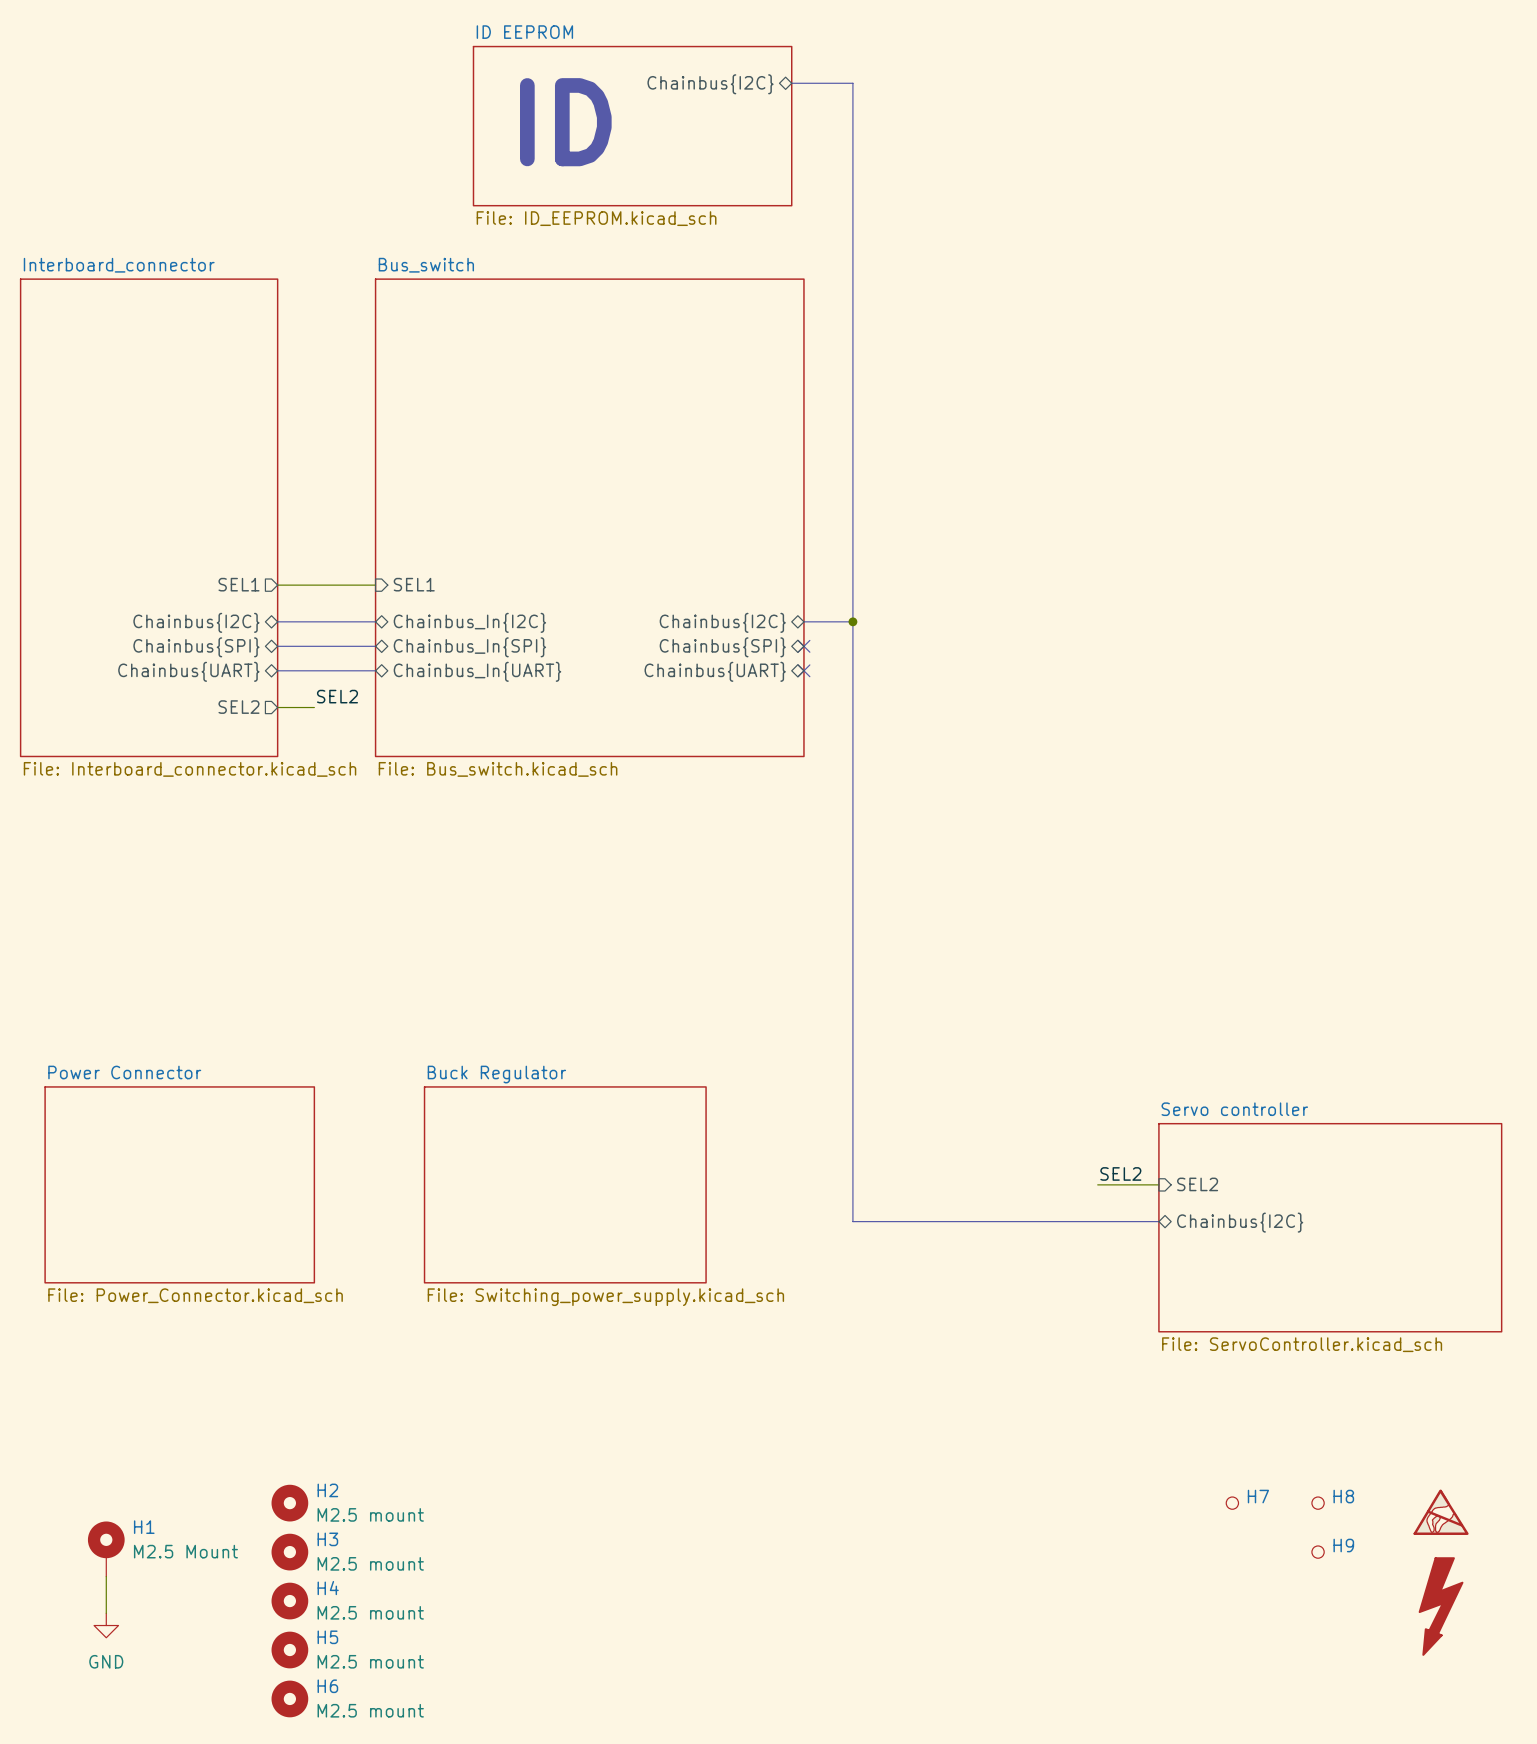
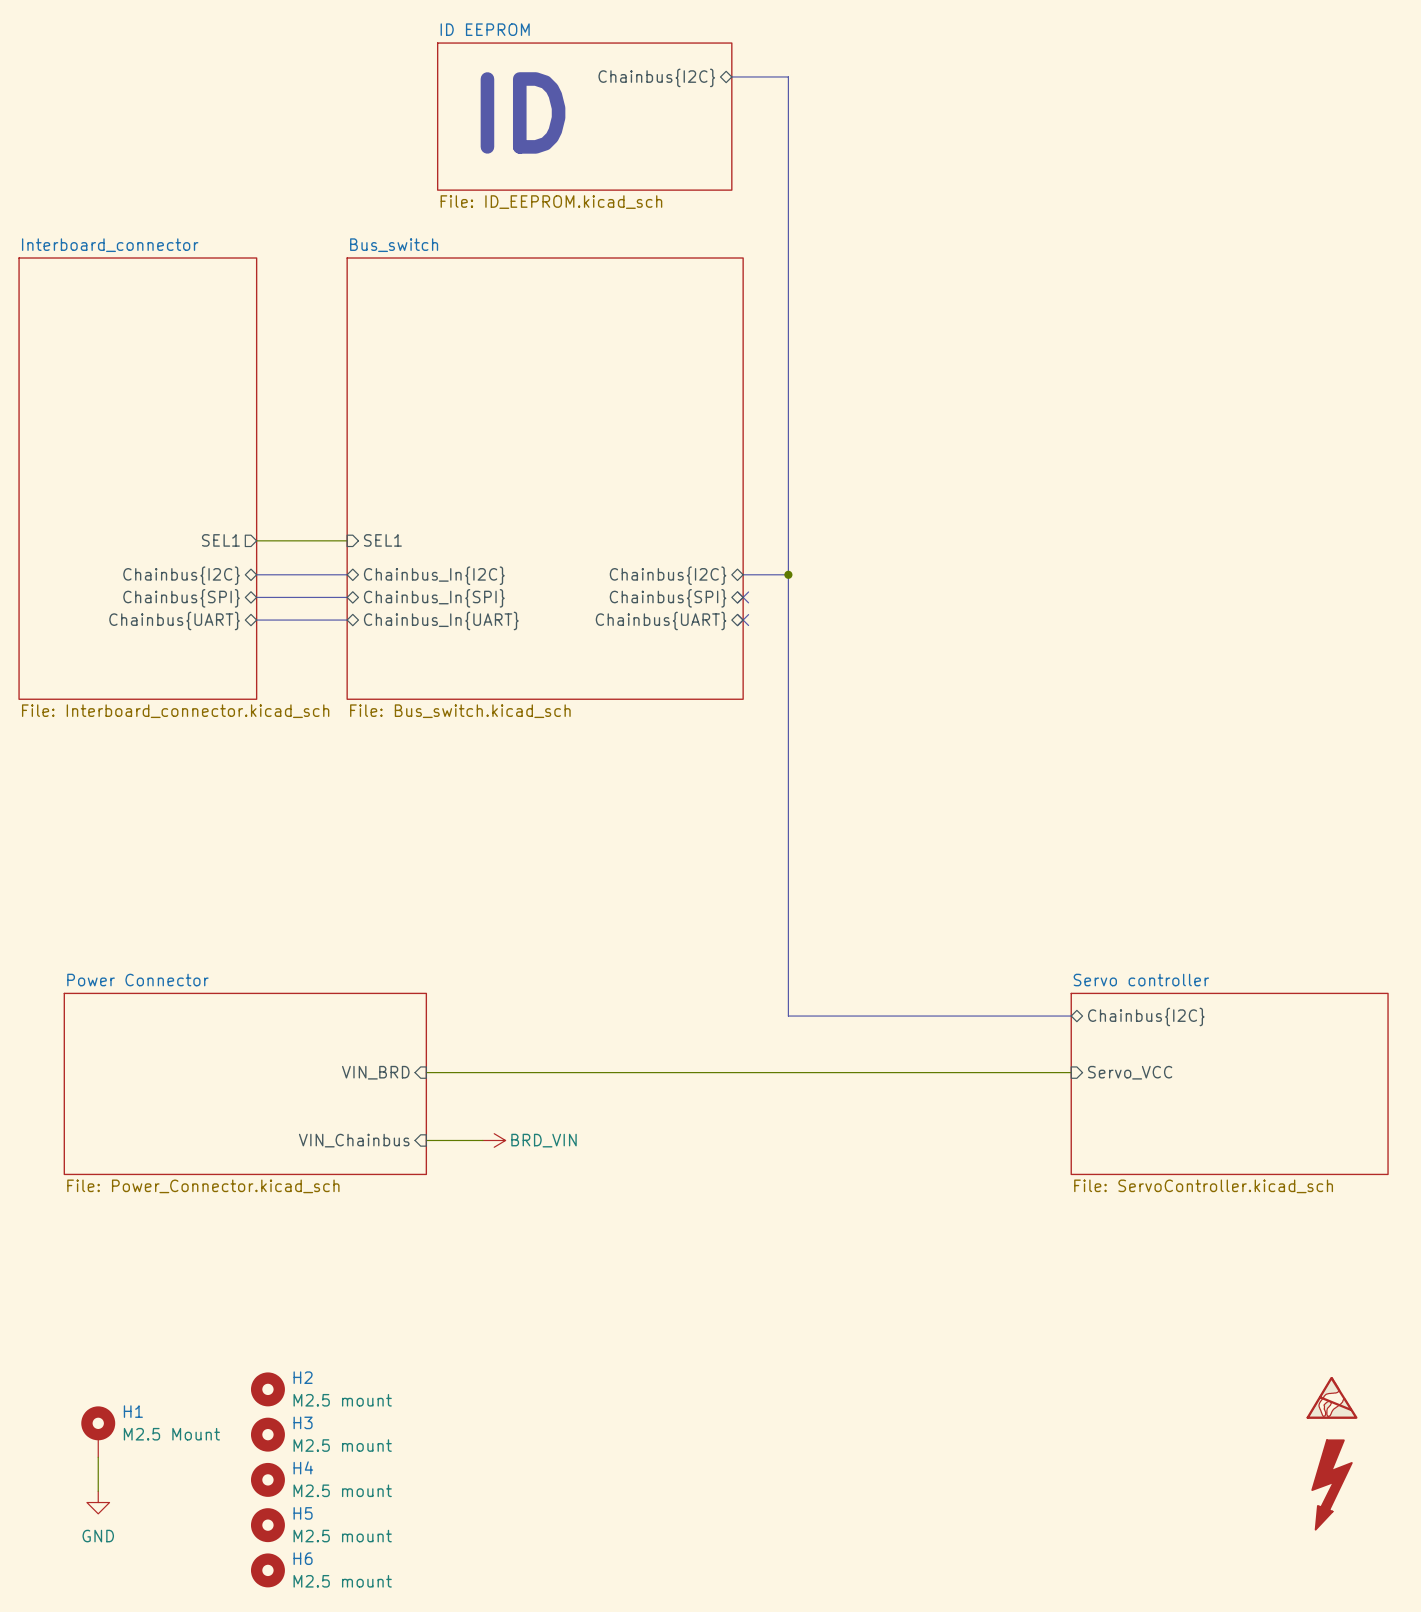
label: SEL2 (337, 696) -> none
sheet pin: SEL2 (238, 707) -> none
wire: (277, 707) (314, 707) -> none
bus: (852, 1099) (852, 1221) (1158, 1221) -> (788, 1016) (1071, 1016)
sheet pin: none -> VIN_BRD (375, 1072)
wire: none -> (426, 1072) (1071, 1072)
sheet pin: none -> Servo_VCC (1130, 1072)
sheet Power Connector: none -> File: Power_Connector.kicad_sch (245, 1083)
sheet Servo controller: none -> File: ServoController.kicad_sch (1229, 1083)
label: SEL2 (1120, 1173) -> none
sheet Power Connector: File: Power_Connector.kicad_sch (179, 1184) -> none
sheet Buck Regulator: File: Switching_power_supply.kicad_sch (565, 1184) -> none
wire: (1097, 1184) (1158, 1184) -> none
sheet pin: SEL2 (1197, 1184) -> none
sheet pin position: Chainbus{I2C} (1240, 1222) -> Chainbus{I2C} (1146, 1016)
sheet Servo controller: File: ServoController.kicad_sch (1330, 1227) -> none
sheet pin: none -> VIN_Chainbus (354, 1140)
wire: none -> (426, 1140) (482, 1140)
power symbol: none -> BRD_VIN (494, 1140)
H7: (1232, 1503) -> none
H8: (1318, 1503) -> none
H9: (1318, 1552) -> none

